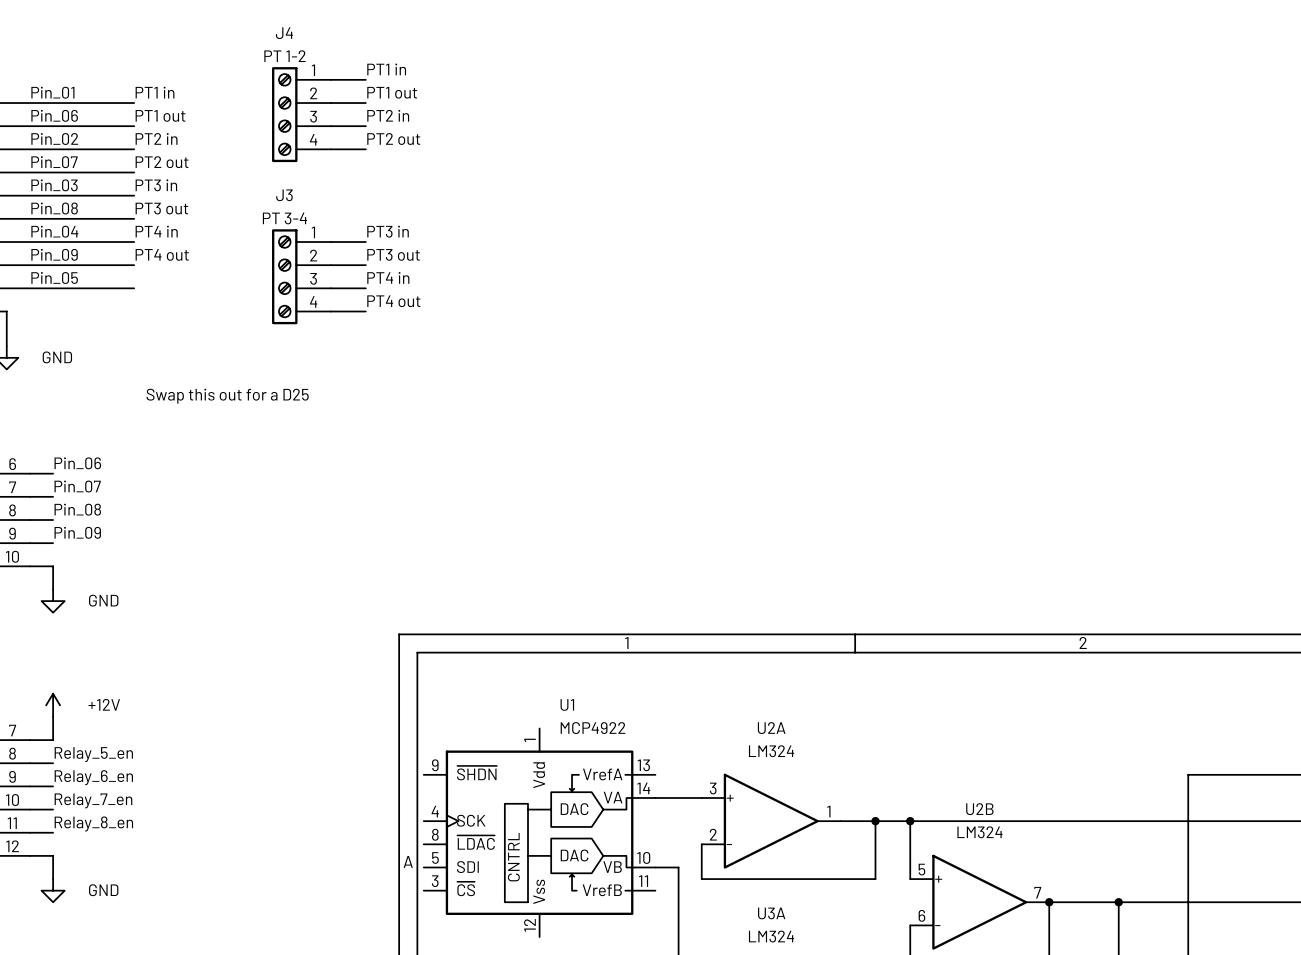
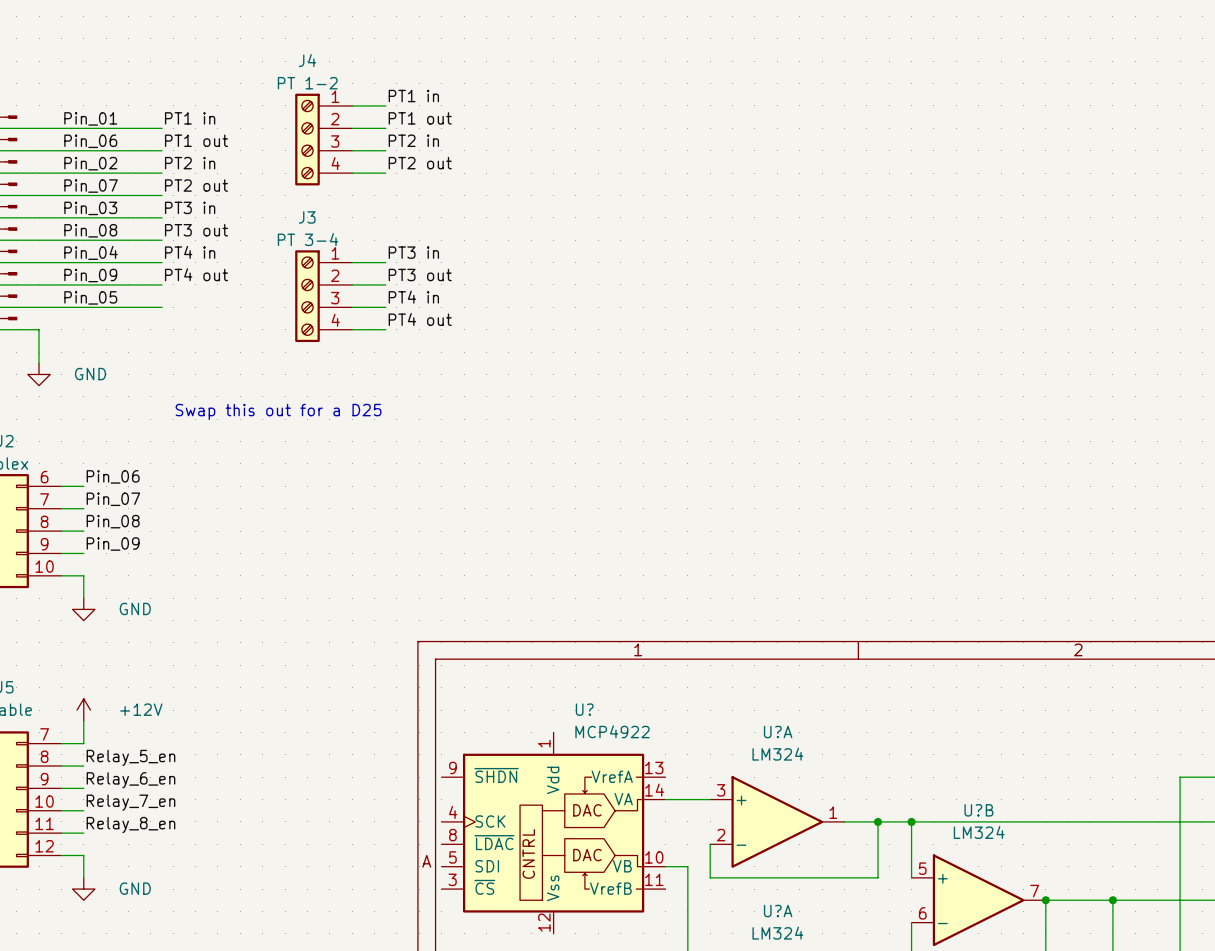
U1 name: U1 (567, 704) -> U? (584, 709)
U2A name: U2A (771, 728) -> U?A (778, 732)
U2B name: U2B (979, 809) -> U?B (978, 810)
U3A name: U3A (771, 913) -> U?A (778, 911)

